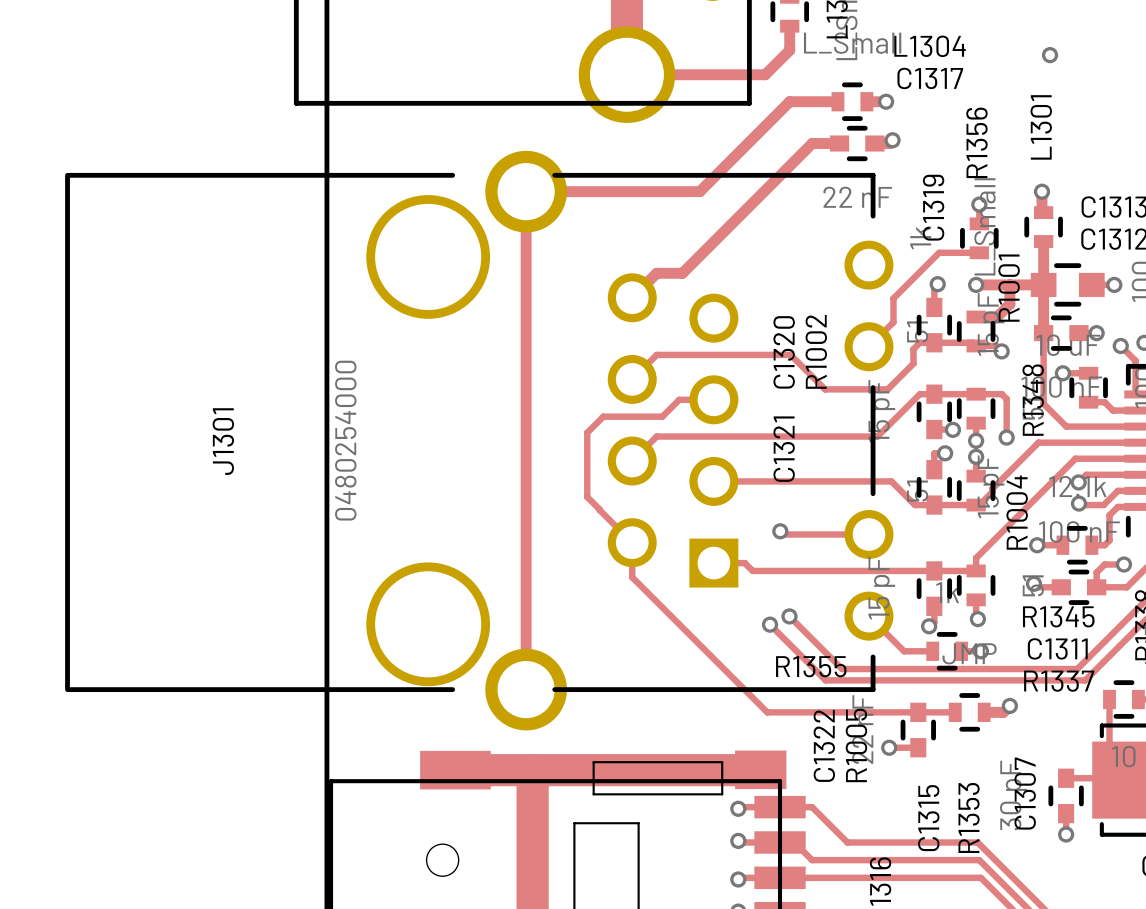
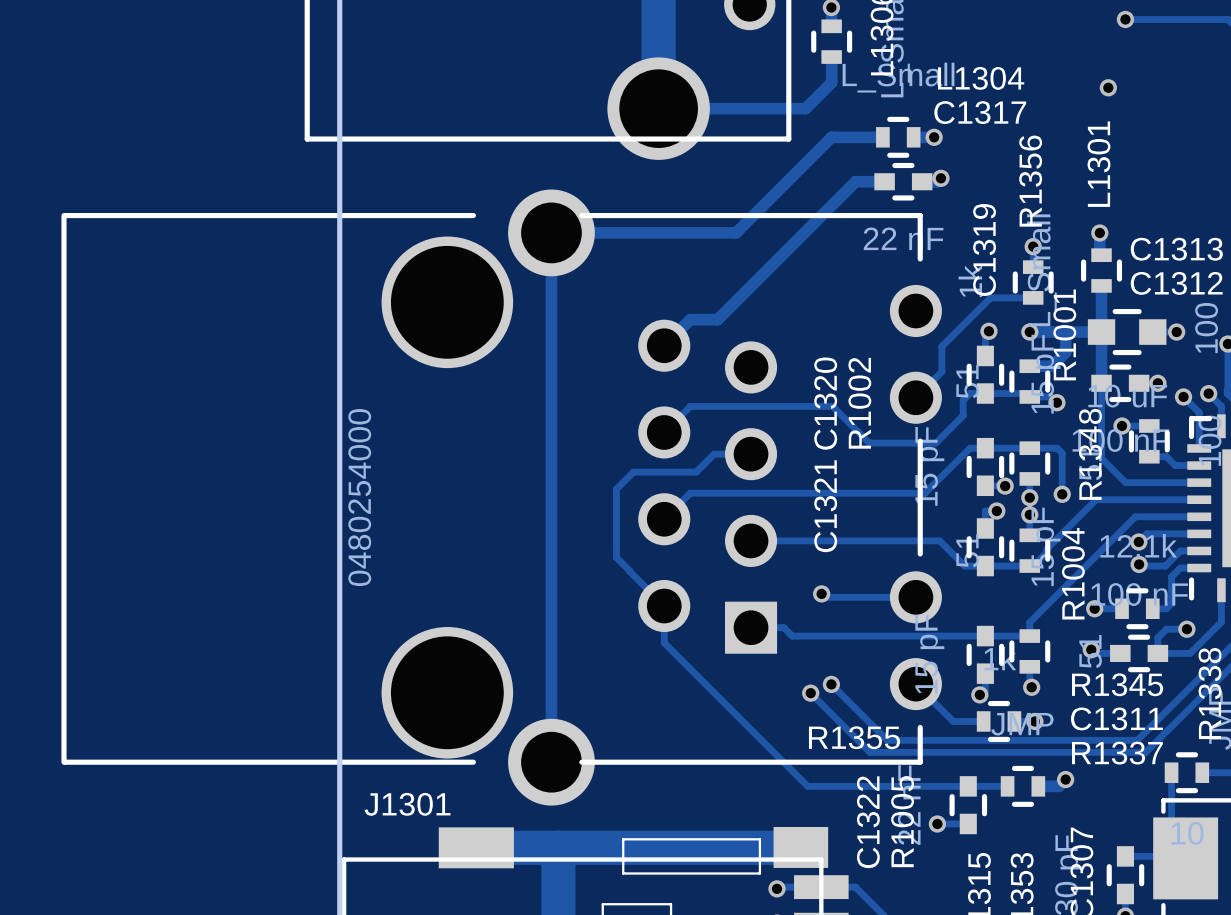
J1301 name rotation: 0° (223, 441) -> 90° clockwise (407, 804)
J1301 name position: J1301 (223, 441) -> J1301 (407, 804)

